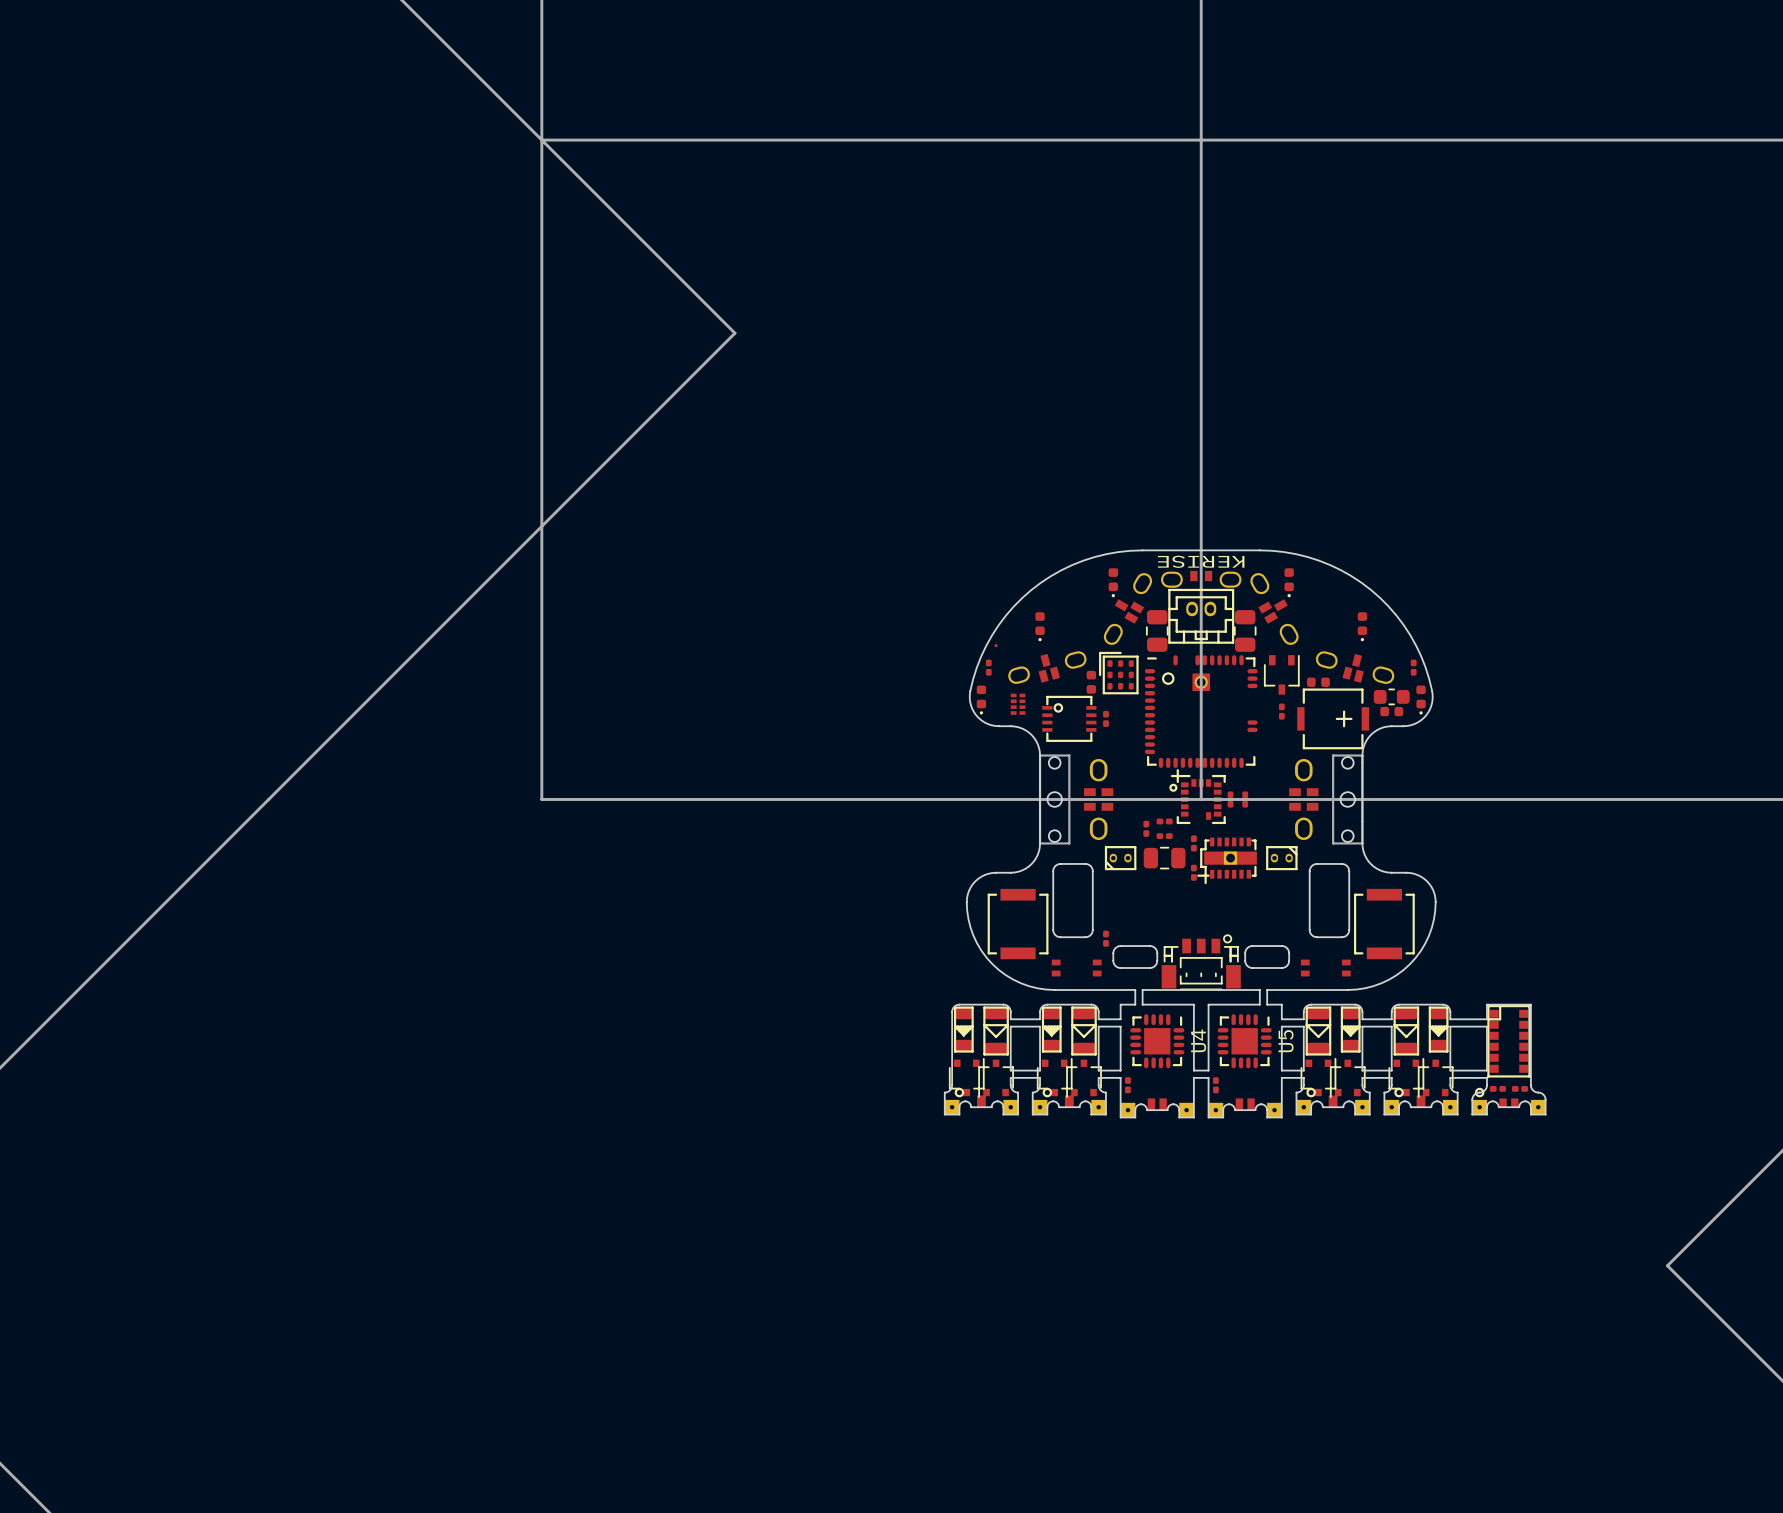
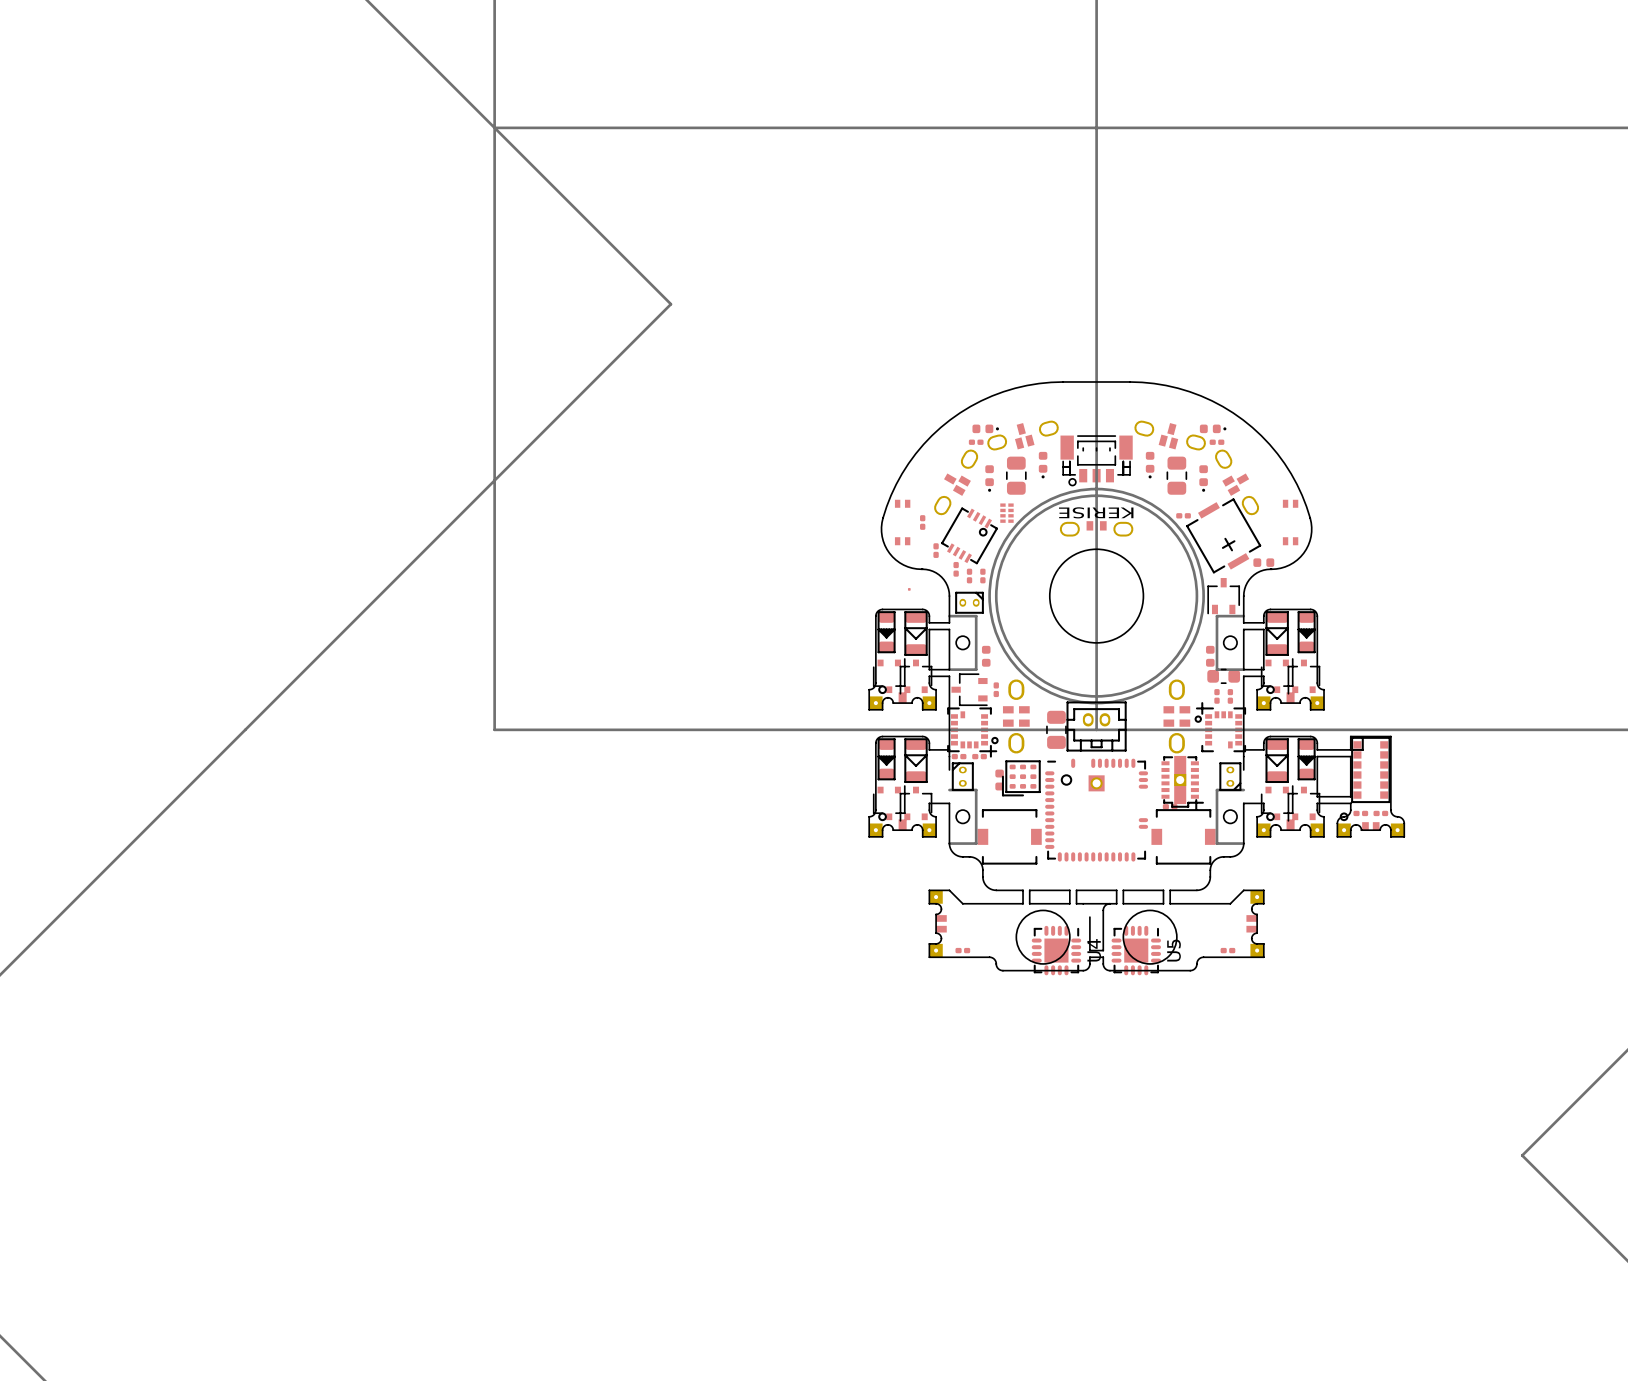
part: none -> (985, 428)
part: none -> (1213, 428)
part: none -> (976, 442)
part: none -> (1216, 442)
part: none -> (1096, 460)
part: none -> (1043, 465)
part: none -> (1150, 465)
part: none -> (1016, 475)
part: none -> (1176, 475)
part: none -> (989, 478)
part: none -> (1203, 478)
drawing: none -> [988, 487, 1205, 705]
part: none -> (1183, 515)
part: none -> (902, 522)
part: none -> (922, 522)
part: none -> (1290, 522)
part: (1113, 582) -> none
part: (1289, 582) -> none
part: none -> (969, 535)
part: none -> (1223, 535)
round board edge: none -> [1049, 548, 1145, 644]
part: none -> (936, 550)
part position: (1127, 608) -> (956, 482)
part position: (1274, 608) -> (1237, 482)
part footprint: [1035, 612, 1045, 642] -> [953, 561, 959, 577]
part: (1201, 616) -> none
part: none -> (1263, 562)
part: (1362, 626) -> none
part: none -> (969, 576)
part: none -> (982, 576)
part: (1157, 630) -> none
part: (1245, 630) -> none
part: none -> (969, 602)
part: (988, 667) -> none
part position: (1047, 667) -> (1023, 435)
part position: (1355, 667) -> (1170, 435)
part: (1413, 667) -> none
part: (1118, 673) -> none
line: none -> (949, 616) (976, 616) (976, 669) (949, 669)
part rotation: 0° (1281, 674) -> 180° (1223, 596)
part position: (1281, 674) -> (1223, 596)
line: none -> (1243, 616) (1216, 616) (1216, 669) (1243, 669)
part: (1091, 682) -> none
part: (1318, 682) -> none
part footprint: [1297, 688, 1370, 750] -> [1206, 645, 1215, 667]
part footprint: [1373, 688, 1410, 706] -> [1265, 611, 1289, 656]
part: none -> (886, 632)
part: none -> (1306, 632)
part: none -> (916, 633)
part footprint: [1042, 695, 1097, 742] -> [981, 645, 991, 667]
round board edge: none -> [955, 635, 971, 651]
round board edge: none -> [1223, 635, 1238, 651]
part: (981, 699) -> none
part: (1421, 699) -> none
part position: (1018, 704) -> (1006, 513)
part position: (1201, 711) -> (1096, 810)
part: (1281, 711) -> none
part: (1391, 711) -> none
part position: (1105, 718) -> (996, 689)
part: none -> (889, 675)
part: none -> (1223, 676)
part: none -> (1277, 675)
part: none -> (916, 677)
part: none -> (1303, 677)
board edge: (1040, 755) (1037, 744) (1028, 732) (1018, 727) (988, 724) (978, 718) (972, 709) (970, 691) (976, 667) (986, 645) (998, 625) (1013, 606) (1031, 590) (1051, 576) (1072, 565) (1095, 556) (1118, 552) (1142, 550) (1259, 550) (1295, 554) (1318, 560) (1340, 570) (1361, 582) (1380, 597) (1403, 625) (1416, 645) (1429, 679) (1432, 698) (1428, 712) (1417, 722) (1407, 725) (1384, 727) (1373, 732) (1364, 744) (1362, 755) -> (949, 689) (949, 676) (929, 676) (930, 686) (936, 689) (936, 709) (922, 709) (922, 701) (917, 697) (913, 699) (911, 703) (893, 703) (891, 698) (886, 697) (882, 701) (882, 709) (869, 709) (869, 689) (873, 688) (875, 683) (875, 616) (877, 611) (882, 609) (923, 609) (928, 613) (929, 622) (949, 622) (949, 592) (943, 579) (932, 571) (912, 568) (899, 562) (889, 553) (883, 541) (881, 527) (882, 518) (891, 495) (902, 473) (923, 444) (940, 427) (960, 412) (992, 395) (1015, 388) (1038, 383) (1130, 381) (1154, 383) (1178, 388) (1200, 395) (1233, 412) (1261, 435) (1277, 453) (1296, 484) (1306, 506) (1311, 527) (1311, 536) (1306, 549) (1297, 560) (1289, 565) (1260, 571) (1249, 579) (1243, 592) (1243, 622) (1263, 622) (1264, 613) (1269, 609) (1310, 609) (1315, 611) (1317, 616) (1317, 683) (1319, 688) (1324, 689) (1324, 709) (1310, 709) (1310, 701) (1305, 697) (1301, 699) (1299, 703) (1281, 703) (1279, 698) (1274, 697) (1270, 701) (1270, 709) (1257, 709) (1257, 689) (1262, 686) (1263, 676) (1243, 676) (1243, 689)
line: (1040, 755) (1069, 755) (1069, 843) (1040, 843) (1040, 755) -> none
part: none -> (969, 689)
line: (1333, 755) (1362, 755) (1362, 843) (1333, 843) (1333, 755) -> none
round board edge: [1048, 756, 1062, 770] -> none
round board edge: [1341, 756, 1355, 770] -> none
part: none -> (1216, 696)
part: none -> (1230, 696)
part: none -> (902, 697)
part: none -> (1290, 697)
part footprint: [1169, 769, 1226, 825] -> [1066, 701, 1127, 752]
round board edge: [1046, 791, 1063, 808] -> none
round board edge: [1339, 791, 1356, 808] -> none
part: none -> (1220, 727)
part position: (1098, 799) -> (1016, 716)
part: (1230, 799) -> none
part: (1245, 799) -> none
part position: (1303, 799) -> (1176, 716)
part: none -> (972, 732)
board edge: none -> (949, 749) (929, 749) (928, 740) (923, 736) (882, 736) (877, 738) (875, 743) (875, 810) (873, 815) (869, 816) (869, 836) (882, 836) (882, 828) (887, 824) (891, 826) (893, 830) (911, 830) (914, 825) (918, 825) (922, 828) (922, 836) (936, 836) (936, 816) (930, 813) (929, 803) (949, 803) (949, 843) (952, 851) (957, 855) (972, 857) (978, 860) (982, 866) (983, 882) (989, 888) (1023, 890) (1023, 903)
part: (1164, 821) -> none
part: none -> (959, 756)
part: none -> (979, 756)
part: (1146, 828) -> none
round board edge: [1048, 829, 1062, 843] -> none
round board edge: [1341, 829, 1355, 843] -> none
part: none -> (886, 759)
part: none -> (1306, 759)
part: none -> (916, 760)
part: none -> (1277, 760)
part: (1164, 836) -> none
board edge: (1040, 843) (1036, 858) (1025, 868) (1014, 872) (988, 873) (975, 881) (967, 894) (967, 910) (973, 935) (981, 950) (992, 964) (1005, 975) (1021, 983) (1037, 988) (1054, 989) -> none
part: (1193, 843) -> none
board edge: (1362, 843) (1366, 858) (1377, 868) (1387, 872) (1413, 873) (1427, 881) (1434, 894) (1435, 910) (1428, 935) (1420, 950) (1409, 964) (1396, 975) (1381, 983) (1364, 988) (1347, 989) -> (1103, 963) (1105, 968) (1109, 970) (1190, 970) (1194, 968) (1198, 959) (1202, 957) (1263, 957) (1263, 943) (1255, 943) (1251, 938) (1253, 934) (1257, 933) (1257, 914) (1252, 912) (1251, 907) (1255, 903) (1263, 903) (1263, 890) (1243, 890) (1230, 903)
part footprint: [1104, 846, 1137, 871] -> [1001, 760, 1041, 797]
part: none -> (962, 776)
part: none -> (999, 780)
part rotation: 0° (1164, 858) -> 90° clockwise (1056, 729)
part position: (1164, 858) -> (1056, 729)
part rotation: 0° (1281, 858) -> 90° clockwise (1230, 776)
part position: (1281, 858) -> (1230, 776)
part rotation: 0° (1227, 860) -> 90° counterclockwise (1182, 783)
part position: (1227, 860) -> (1182, 783)
board edge: (1060, 863) (1086, 864) (1092, 868) (1092, 929) (1088, 936) (1059, 937) (1053, 932) (1053, 870) (1055, 866) (1060, 863) -> none
board edge: (1316, 863) (1342, 864) (1348, 868) (1349, 929) (1344, 936) (1316, 937) (1310, 932) (1309, 870) (1312, 865) (1316, 863) -> none
line: none -> (949, 790) (976, 790) (976, 843) (949, 843)
line: none -> (1243, 790) (1216, 790) (1216, 843) (1243, 843)
part: (1193, 872) -> none
part: none -> (889, 802)
part: none -> (1277, 802)
part: none -> (916, 804)
part: none -> (1303, 804)
part: none -> (1170, 806)
round board edge: none -> [955, 809, 971, 825]
round board edge: none -> [1223, 809, 1238, 825]
part: none -> (1360, 813)
part: none -> (1380, 813)
part: none -> (902, 824)
part: none -> (1290, 824)
part: none -> (1009, 836)
part: none -> (1183, 836)
part: (1018, 924) -> none
part: (1384, 924) -> none
part: (1105, 938) -> none
board edge: (1120, 946) (1153, 947) (1157, 952) (1156, 964) (1150, 967) (1116, 967) (1113, 962) (1113, 952) (1116, 947) (1120, 946) -> none
board edge: (1252, 946) (1285, 947) (1289, 952) (1288, 963) (1282, 967) (1249, 967) (1245, 962) (1245, 952) (1247, 948) (1252, 946) -> none
part: (1201, 962) -> none
part: (1076, 968) -> none
part: (1325, 968) -> none
board edge: (1120, 989) (1127, 989) -> (1069, 903) (1069, 890) (1029, 890) (1029, 903)
board edge: (1135, 989) (1135, 1004) (1120, 1004) (1120, 1019) (1098, 1019) (1098, 1009) (1092, 1004) (1045, 1004) (1040, 1009) (1040, 1019) (1010, 1019) (1010, 1009) (1004, 1004) (955, 1005) (952, 1011) (952, 1086) (949, 1090) (944, 1092) (944, 1114) (959, 1114) (959, 1104) (965, 1101) (969, 1103) (971, 1107) (991, 1107) (993, 1102) (999, 1101) (1003, 1105) (1003, 1114) (1018, 1114) (1018, 1092) (1011, 1088) (1010, 1077) (1040, 1077) (1039, 1088) (1032, 1092) (1032, 1114) (1047, 1114) (1047, 1104) (1053, 1101) (1057, 1103) (1059, 1107) (1079, 1107) (1081, 1102) (1086, 1101) (1091, 1105) (1091, 1114) (1105, 1114) (1105, 1092) (1099, 1088) (1098, 1077) (1120, 1077) (1120, 1117) (1135, 1117) (1135, 1107) (1141, 1104) (1145, 1105) (1147, 1110) (1167, 1110) (1169, 1105) (1174, 1104) (1179, 1108) (1179, 1117) (1193, 1117) (1193, 1077) (1208, 1077) (1208, 1117) (1223, 1117) (1223, 1107) (1229, 1104) (1233, 1105) (1234, 1110) (1255, 1110) (1257, 1105) (1262, 1104) (1266, 1108) (1267, 1117) (1281, 1117) (1281, 1077) (1303, 1077) (1302, 1088) (1296, 1092) (1296, 1114) (1311, 1114) (1311, 1104) (1316, 1101) (1321, 1103) (1322, 1107) (1343, 1107) (1345, 1102) (1350, 1101) (1354, 1105) (1355, 1114) (1369, 1114) (1369, 1092) (1363, 1088) (1362, 1077) (1391, 1077) (1390, 1088) (1384, 1092) (1384, 1114) (1399, 1114) (1399, 1104) (1404, 1101) (1409, 1103) (1410, 1107) (1431, 1107) (1433, 1102) (1438, 1101) (1442, 1105) (1443, 1114) (1457, 1114) (1457, 1092) (1451, 1088) (1450, 1077) (1486, 1077) (1485, 1089) (1472, 1097) (1472, 1114) (1486, 1114) (1487, 1104) (1492, 1101) (1496, 1103) (1498, 1107) (1519, 1107) (1521, 1102) (1526, 1101) (1530, 1105) (1530, 1114) (1545, 1114) (1544, 1096) (1533, 1091) (1531, 1086) (1530, 1004) (1486, 1004) (1486, 1019) (1450, 1019) (1449, 1009) (1443, 1004) (1398, 1004) (1392, 1009) (1391, 1019) (1362, 1019) (1361, 1009) (1356, 1004) (1311, 1004) (1304, 1008) (1303, 1019) (1281, 1019) (1281, 1004) (1267, 1004) (1267, 989) -> (1150, 903) (1156, 903)
board edge: (1142, 989) (1142, 1004) (1193, 1004) -> (1043, 903) (1036, 903)
board edge: (1171, 989) (1179, 989) -> (1116, 903) (1116, 890) (1076, 890) (1076, 903)
board edge: (1223, 989) (1230, 989) -> (1163, 903) (1163, 890) (1123, 890) (1123, 903)
board edge: (1259, 989) (1259, 1004) (1208, 1004) -> (1109, 903) (1104, 907) (1103, 917)
board edge: (1274, 989) (1281, 989) -> (1243, 749) (1263, 749) (1264, 740) (1269, 736) (1311, 736) (1316, 740) (1317, 749) (1350, 749) (1350, 736) (1390, 736) (1390, 810) (1393, 815) (1403, 820) (1404, 836) (1390, 836) (1390, 828) (1385, 824) (1381, 826) (1380, 830) (1361, 830) (1359, 825) (1354, 825) (1350, 828) (1350, 836) (1337, 836) (1337, 820) (1349, 814) (1350, 803) (1317, 803) (1318, 813) (1324, 816) (1324, 836) (1310, 836) (1310, 828) (1305, 824) (1301, 826) (1299, 830) (1281, 830) (1279, 825) (1274, 825) (1270, 828) (1270, 836) (1257, 836) (1257, 816) (1262, 813) (1263, 803) (1243, 803) (1243, 843) (1240, 851) (1235, 855) (1220, 857) (1214, 860) (1210, 866) (1209, 882) (1203, 888) (1170, 890) (1170, 903)
round board edge: none -> [1015, 909, 1071, 965]
round board edge: none -> [1122, 909, 1178, 965]
part footprint: [1041, 1006, 1062, 1053] -> [955, 947, 971, 954]
part footprint: [1340, 1006, 1361, 1053] -> [1220, 947, 1236, 954]
board edge: (1010, 1026) (1040, 1026) (1040, 1070) (1010, 1070) (1010, 1026) -> none
board edge: (1098, 1026) (1120, 1026) (1120, 1070) (1098, 1070) (1098, 1026) -> (929, 629) (949, 629) (949, 669) (929, 669) (929, 629)
board edge: (1281, 1026) (1281, 1070) (1303, 1070) (1303, 1026) (1281, 1026) -> (1243, 629) (1243, 669) (1263, 669) (1263, 629) (1243, 629)
board edge: (1362, 1026) (1362, 1070) (1391, 1070) (1391, 1026) (1362, 1026) -> none
board edge: (1450, 1026) (1486, 1026) (1486, 1070) (1450, 1070) (1450, 1026) -> (1317, 756) (1350, 756) (1350, 796) (1317, 796) (1317, 756)
part: (963, 1029) -> none
part: (1438, 1029) -> none
part: (996, 1031) -> none
part: (1084, 1031) -> none
part: (1318, 1031) -> none
part: (1406, 1031) -> none
board edge: (1193, 1041) (1193, 1048) -> (1089, 950) (1103, 950)
board edge: (1208, 1041) (1208, 1048) -> (1089, 957) (1103, 957)
part position: (1508, 1041) -> (1370, 769)
board edge: (1193, 1055) (1193, 1070) (1208, 1070) (1208, 1055) -> (1089, 963) (1087, 968) (1084, 970) (1002, 970) (998, 968) (994, 959) (990, 957) (929, 957) (929, 943) (938, 943) (941, 938) (939, 934) (936, 933) (936, 914) (940, 912) (941, 907) (937, 903) (929, 903) (929, 890) (949, 890) (962, 903)
part: (966, 1077) -> none
part: (1054, 1077) -> none
part: (1318, 1077) -> none
part: (1406, 1077) -> none
part: (996, 1078) -> none
part: (1084, 1078) -> none
part: (1347, 1078) -> none
part: (1435, 1078) -> none
part: (1127, 1085) -> none
part: (1215, 1085) -> none
part: (1497, 1088) -> none
part: (1519, 1088) -> none
part: (981, 1101) -> none
part: (1069, 1101) -> none
part: (1333, 1101) -> none
part: (1421, 1101) -> none
part position: (1508, 1101) -> (1370, 824)
part side: top (1157, 1107) -> bottom (938, 923)
part side: top (1245, 1107) -> bottom (1255, 923)

